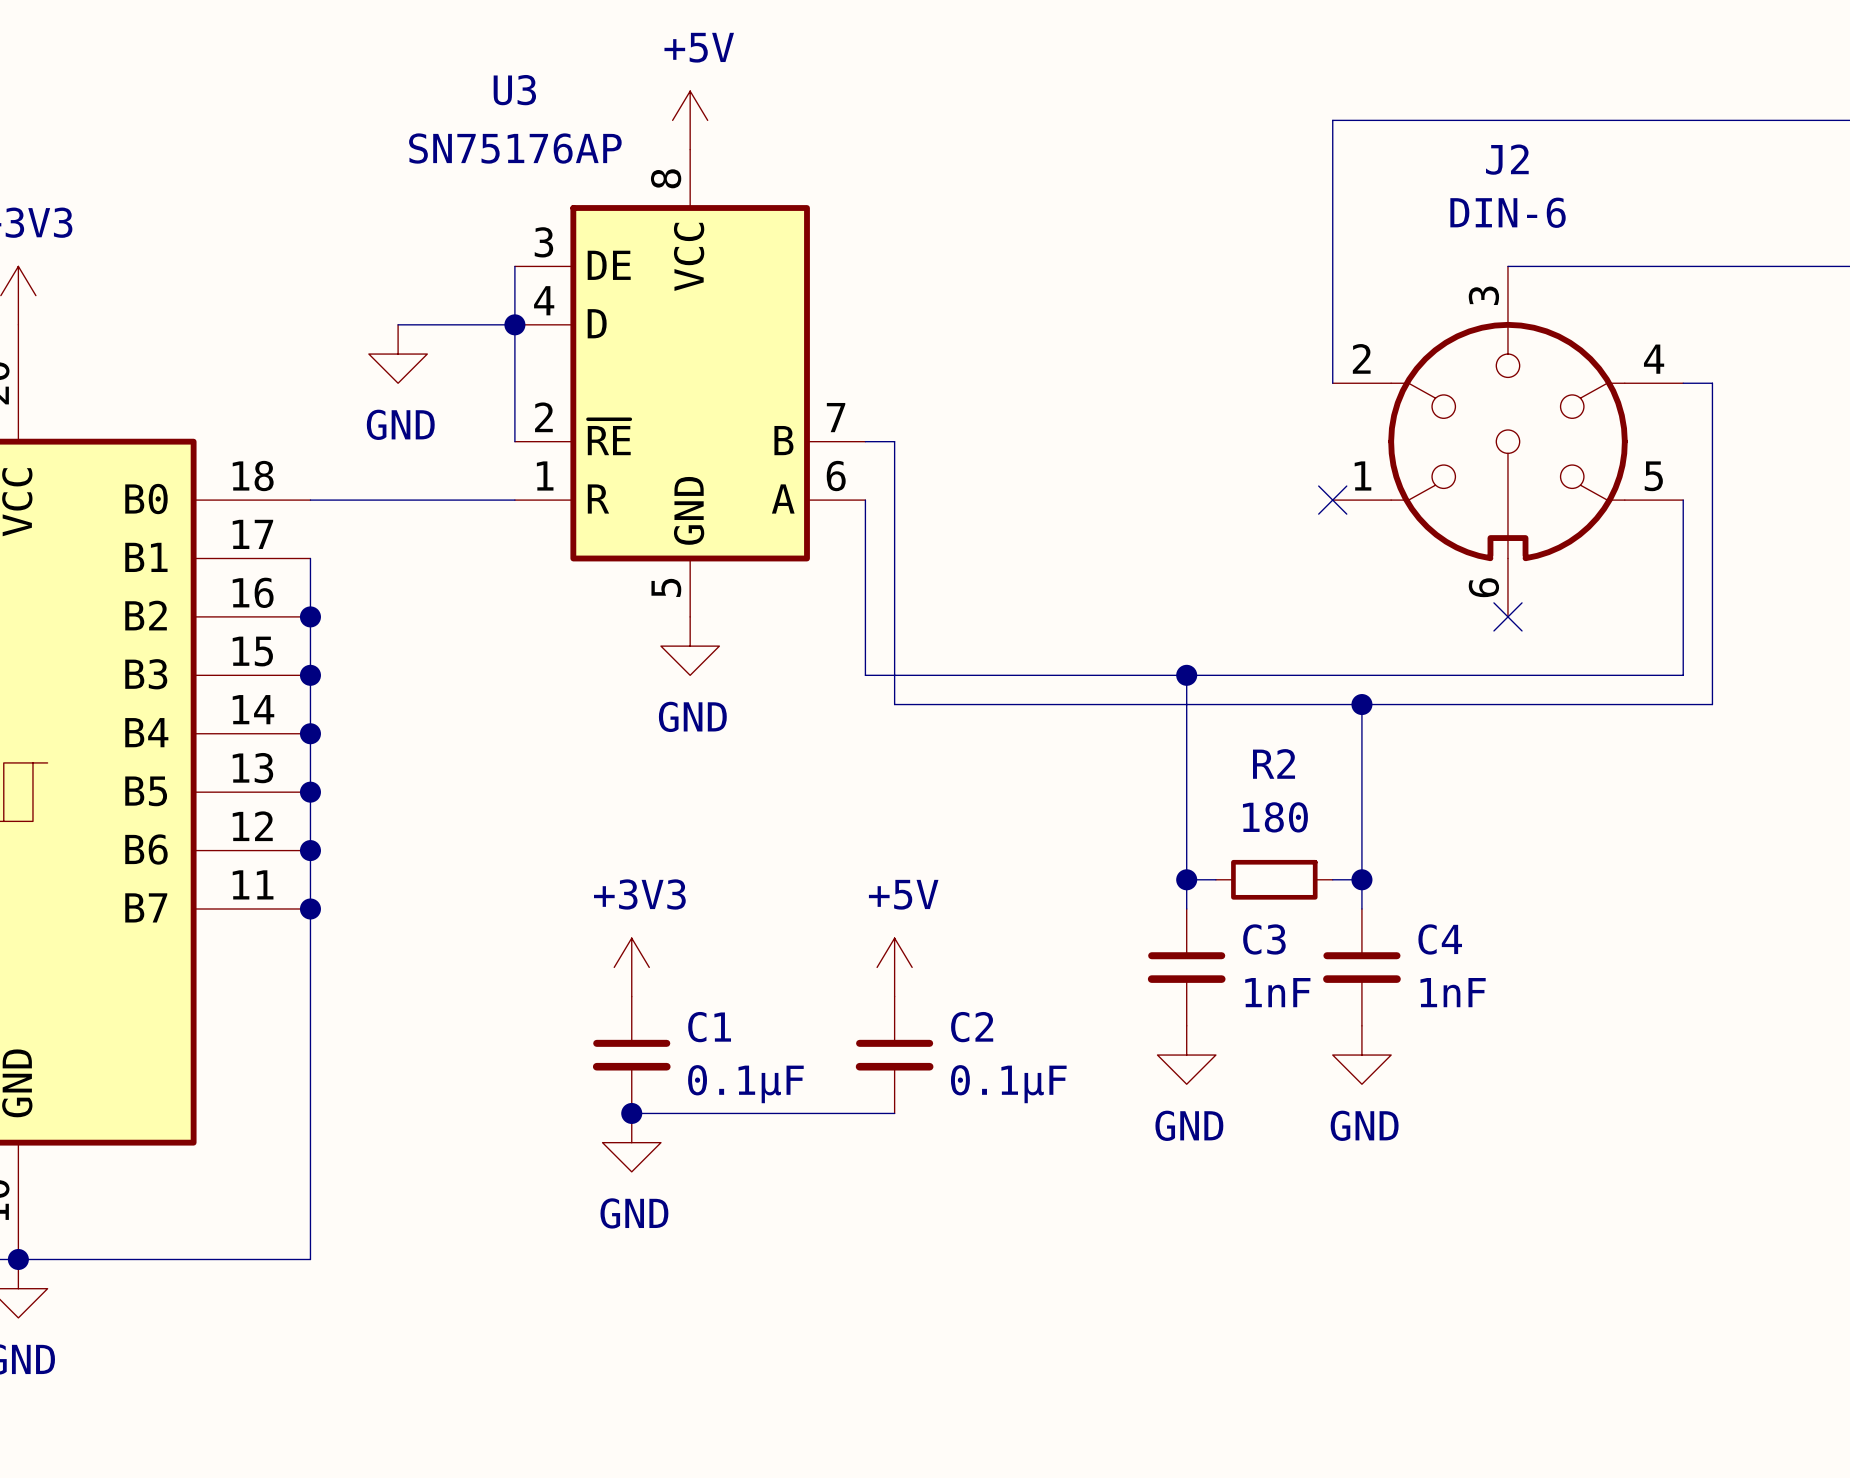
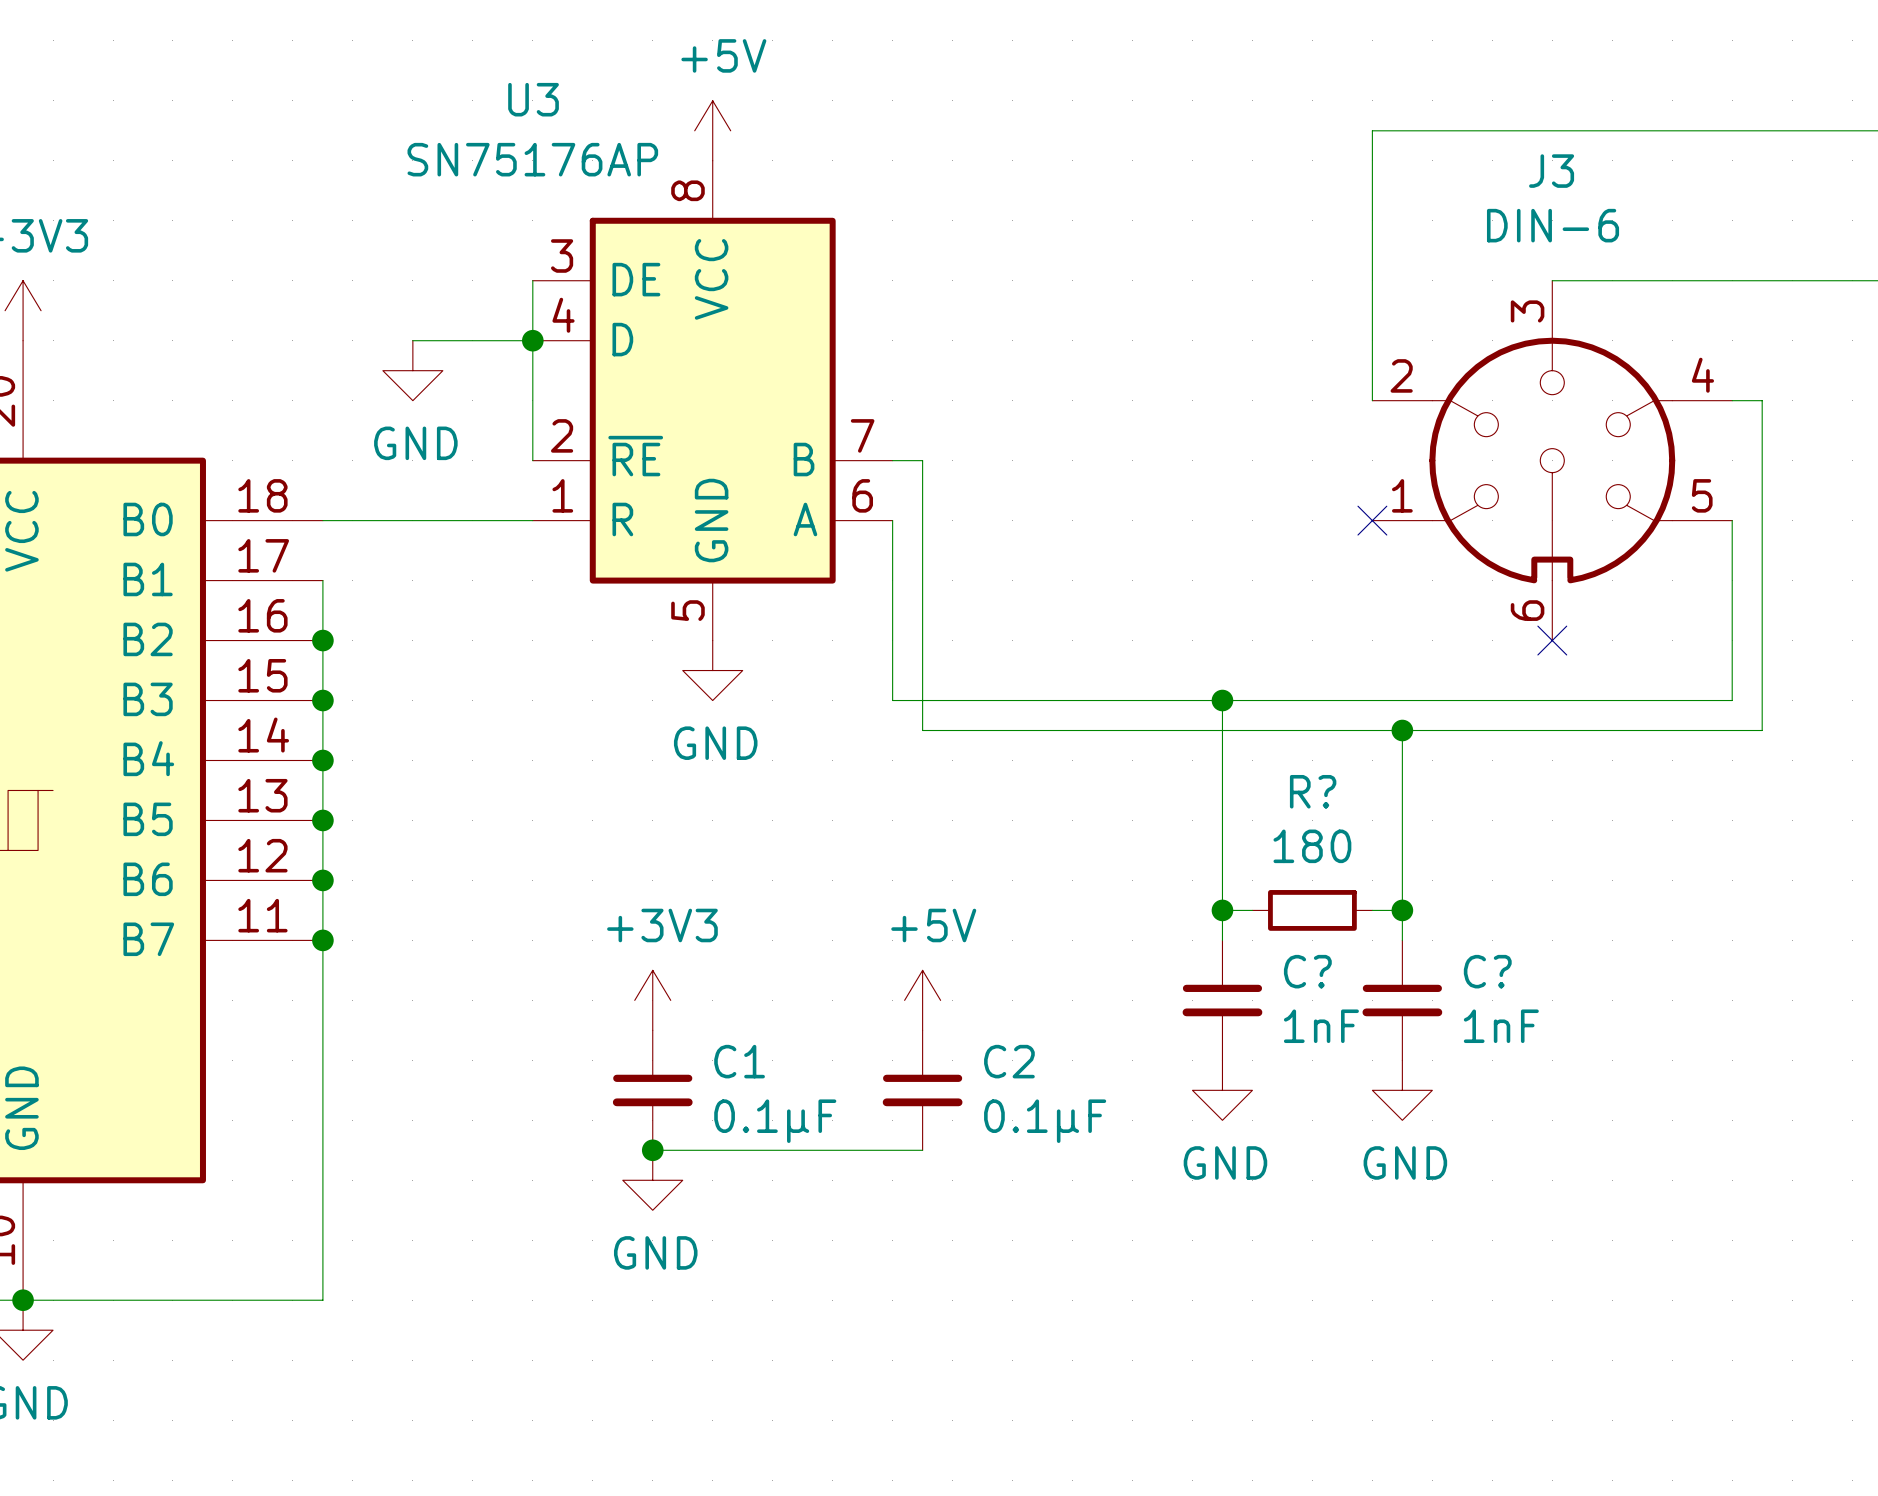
J2 name: J2 (1507, 159) -> J3 (1551, 171)
R2 name: R2 (1274, 763) -> R? (1313, 791)
C3 name: C3 (1264, 939) -> C? (1307, 971)
C4 name: C4 (1440, 939) -> C? (1487, 971)

